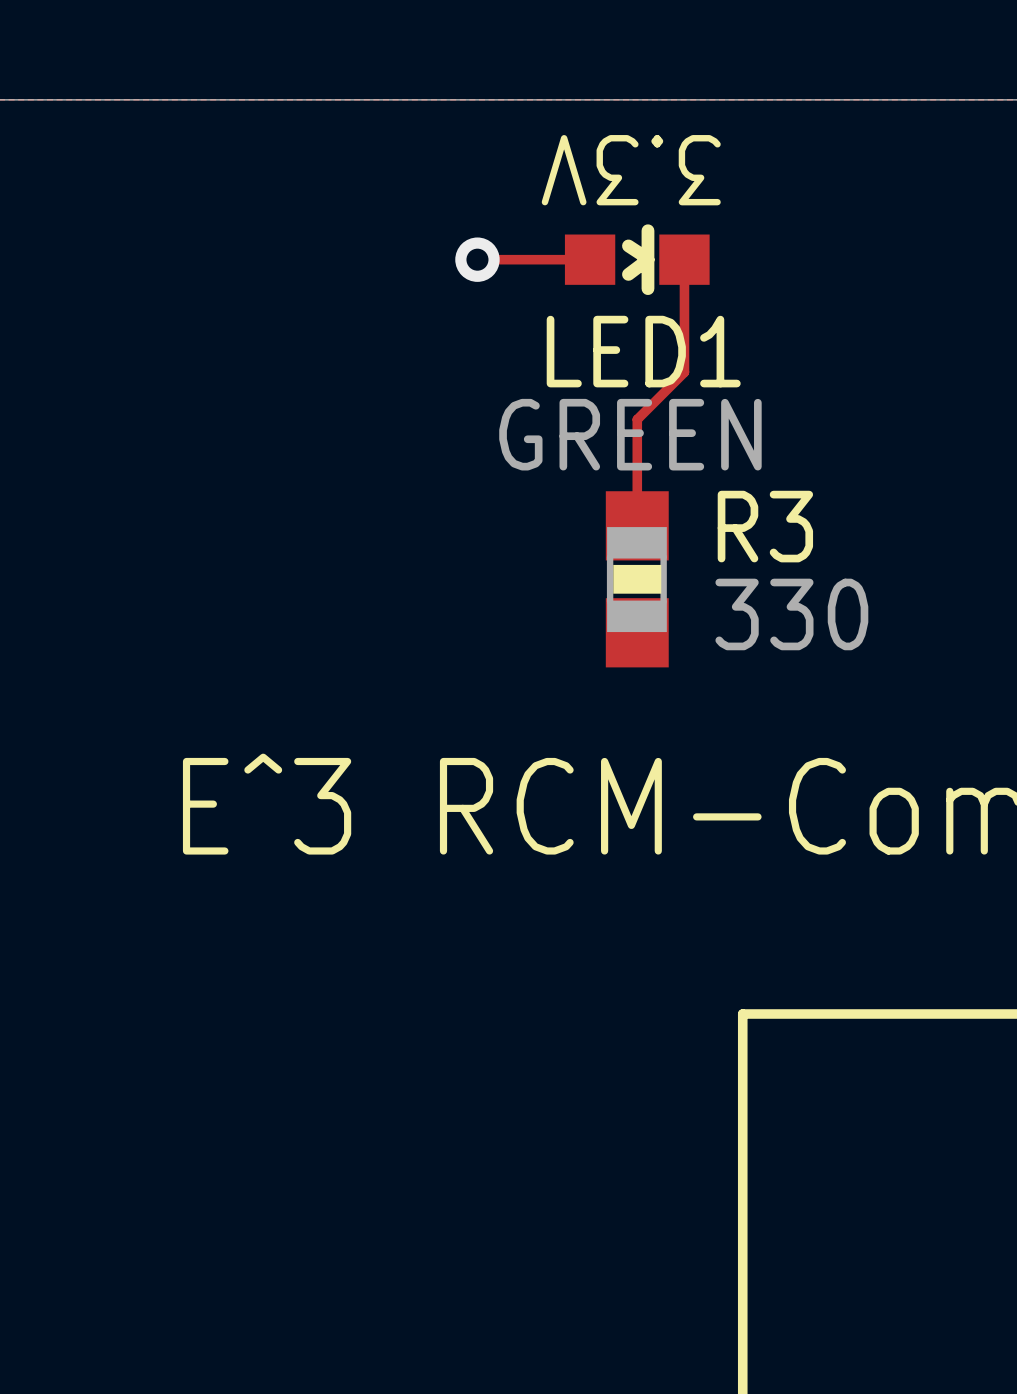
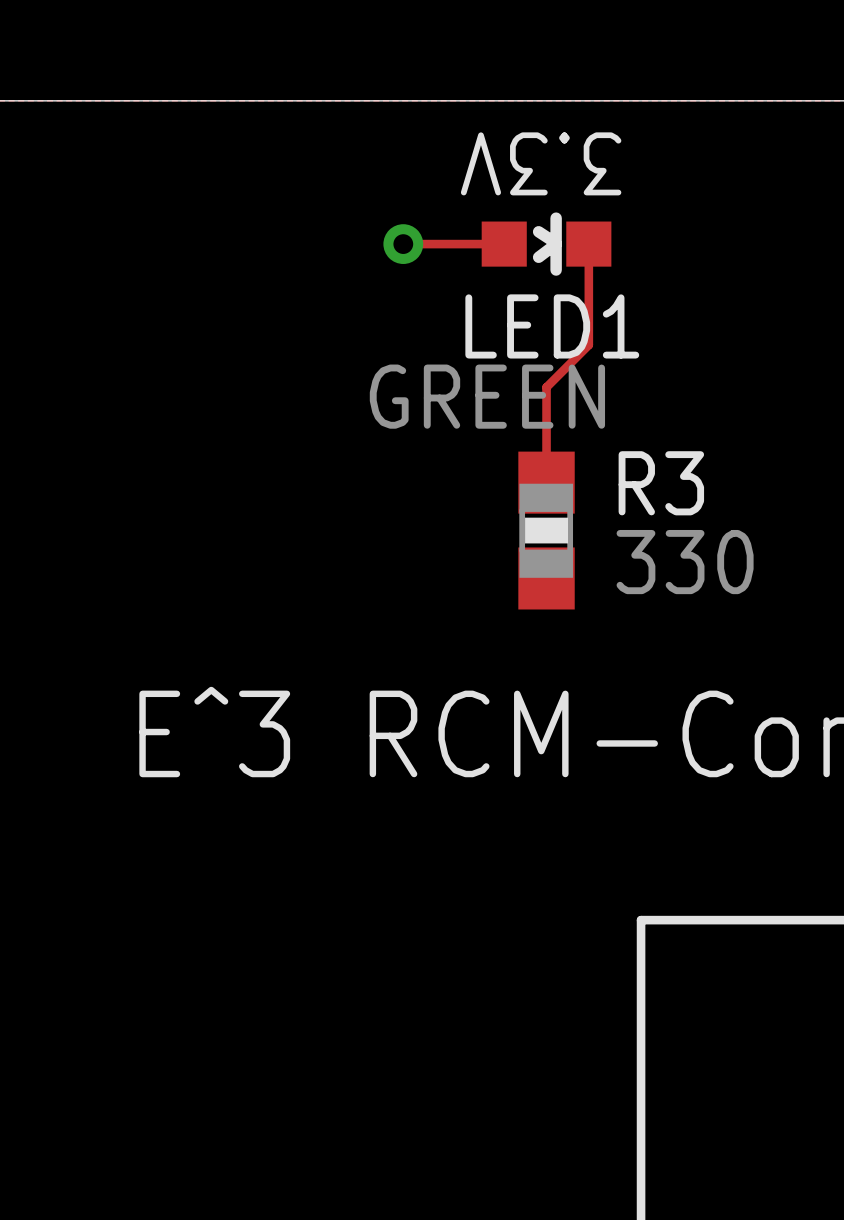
LED1 value position: GREEN (630, 434) -> GREEN (487, 396)

